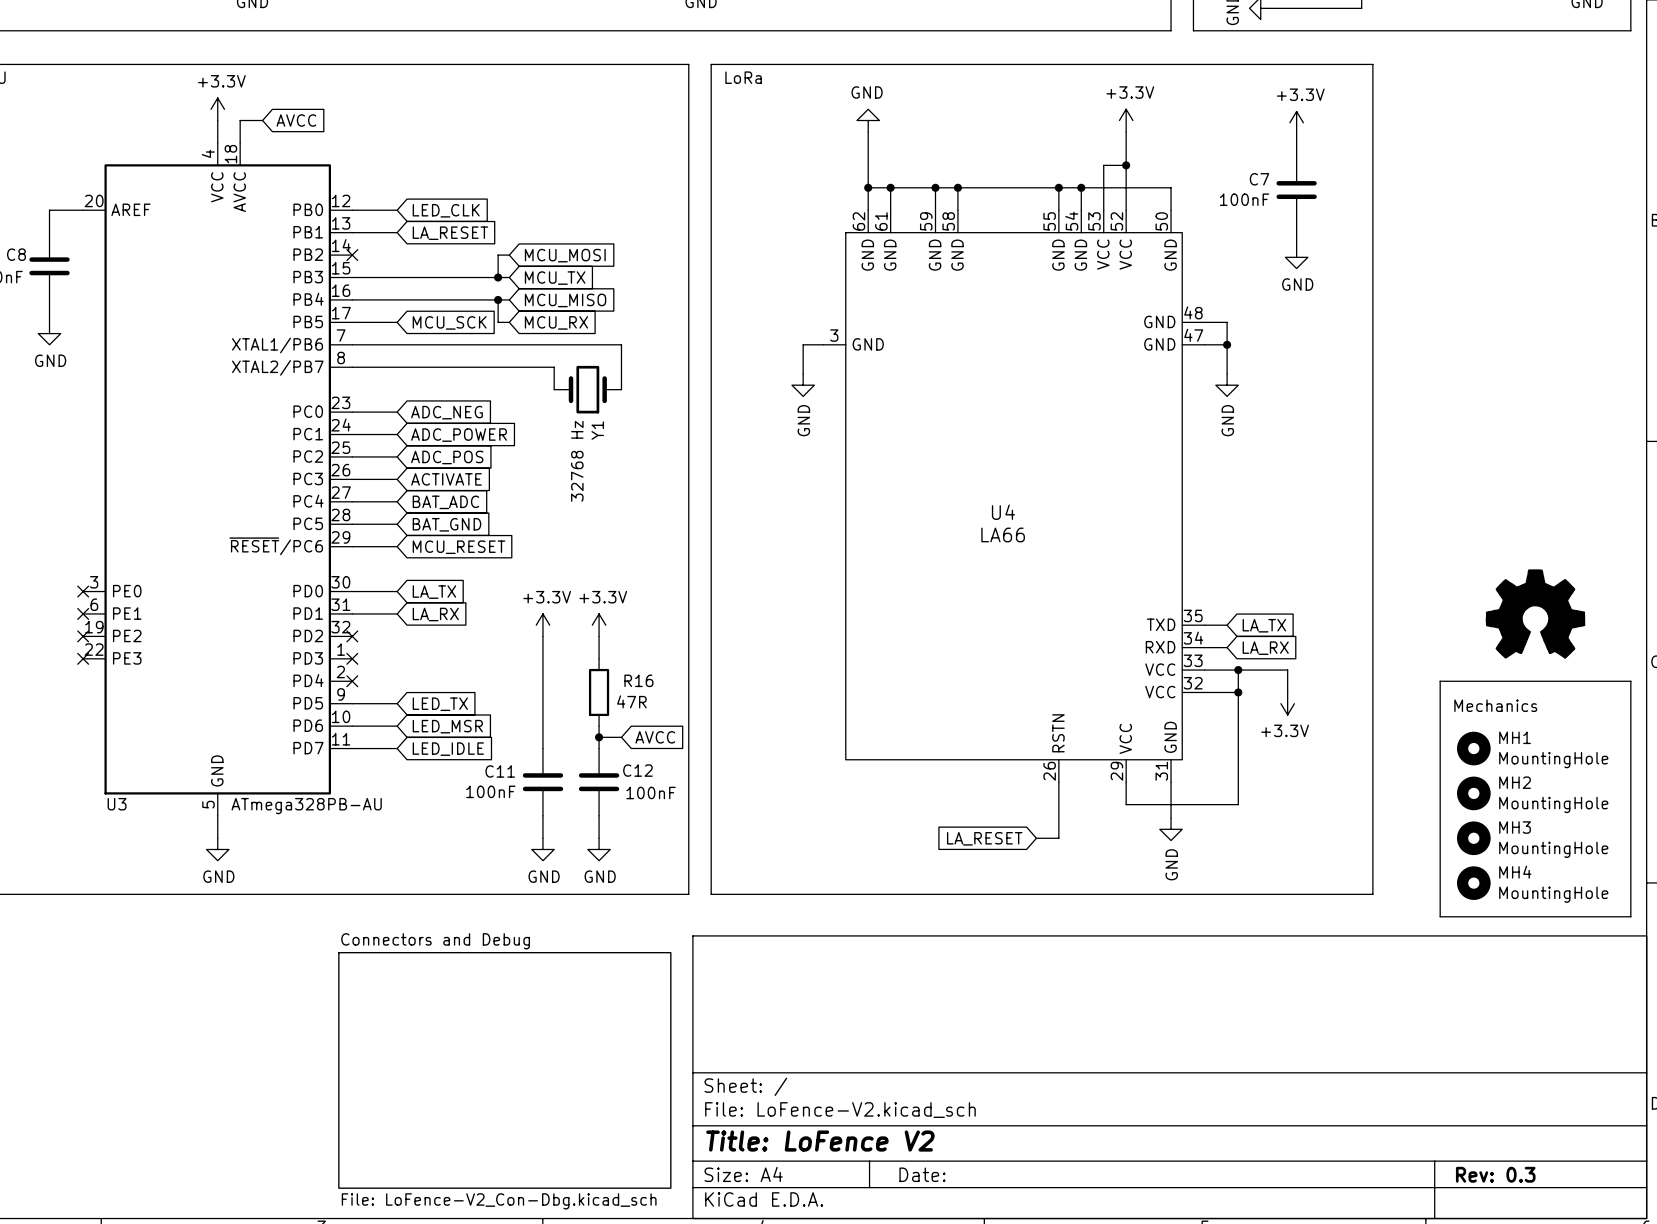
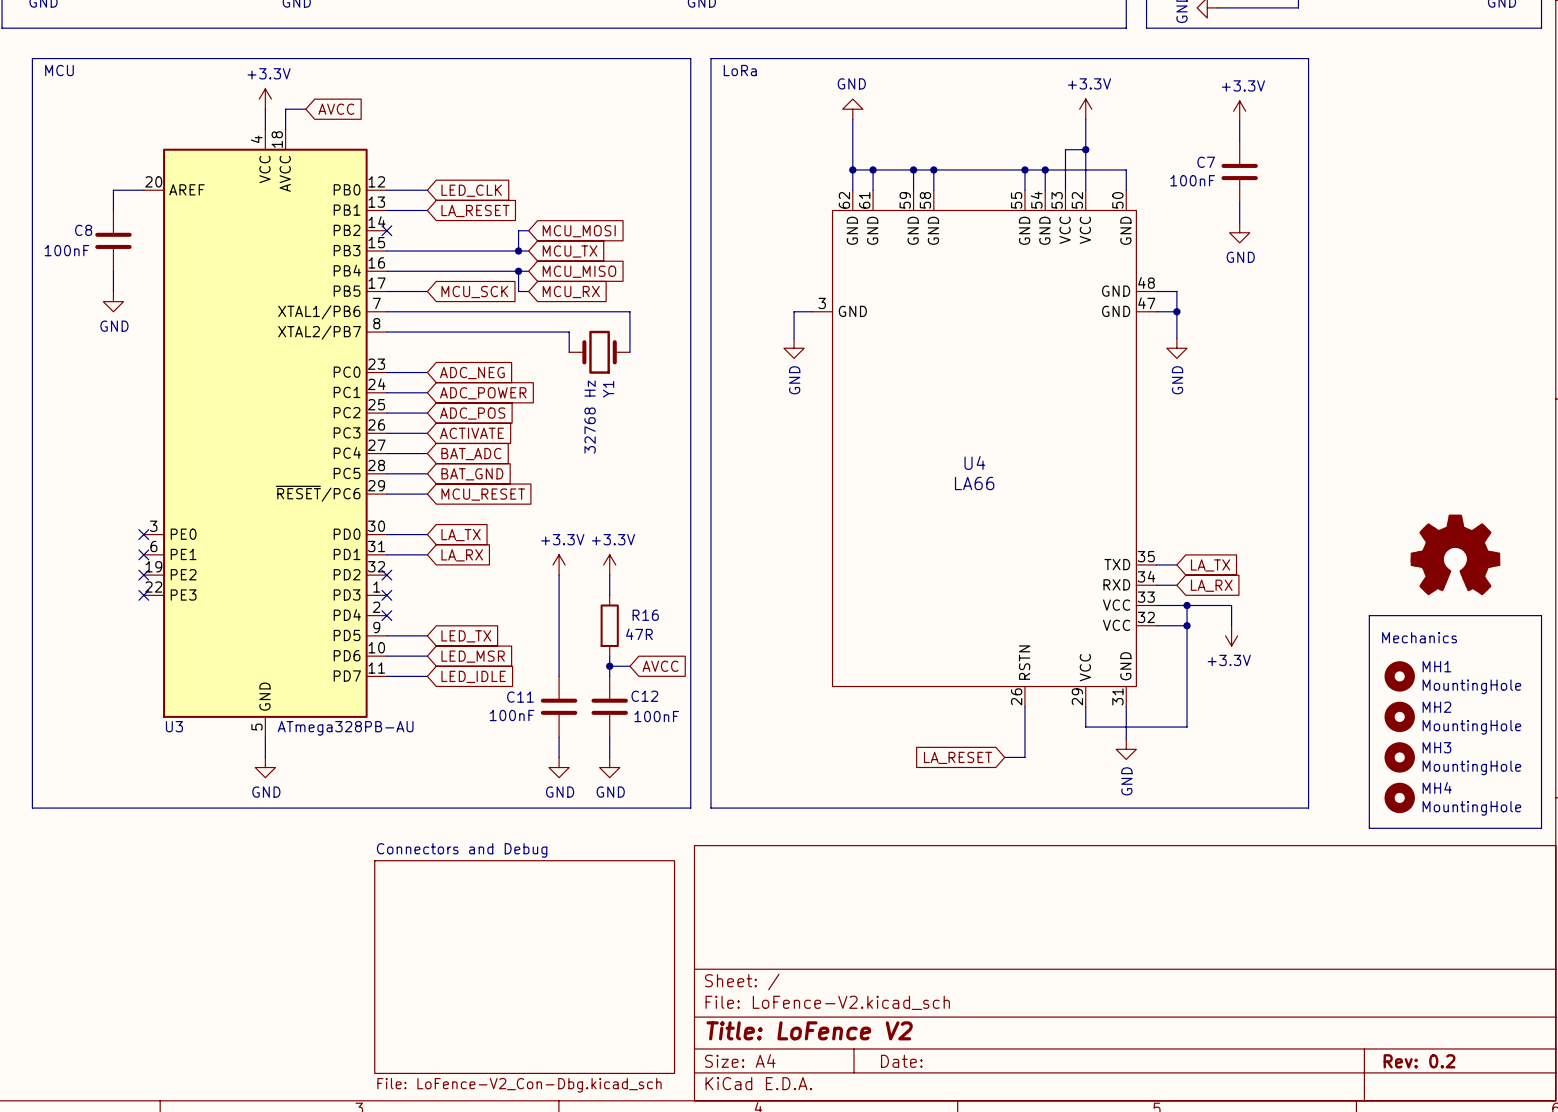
title block: Rev: 0.3 (1495, 1174) -> Rev: 0.2 (1419, 1061)

